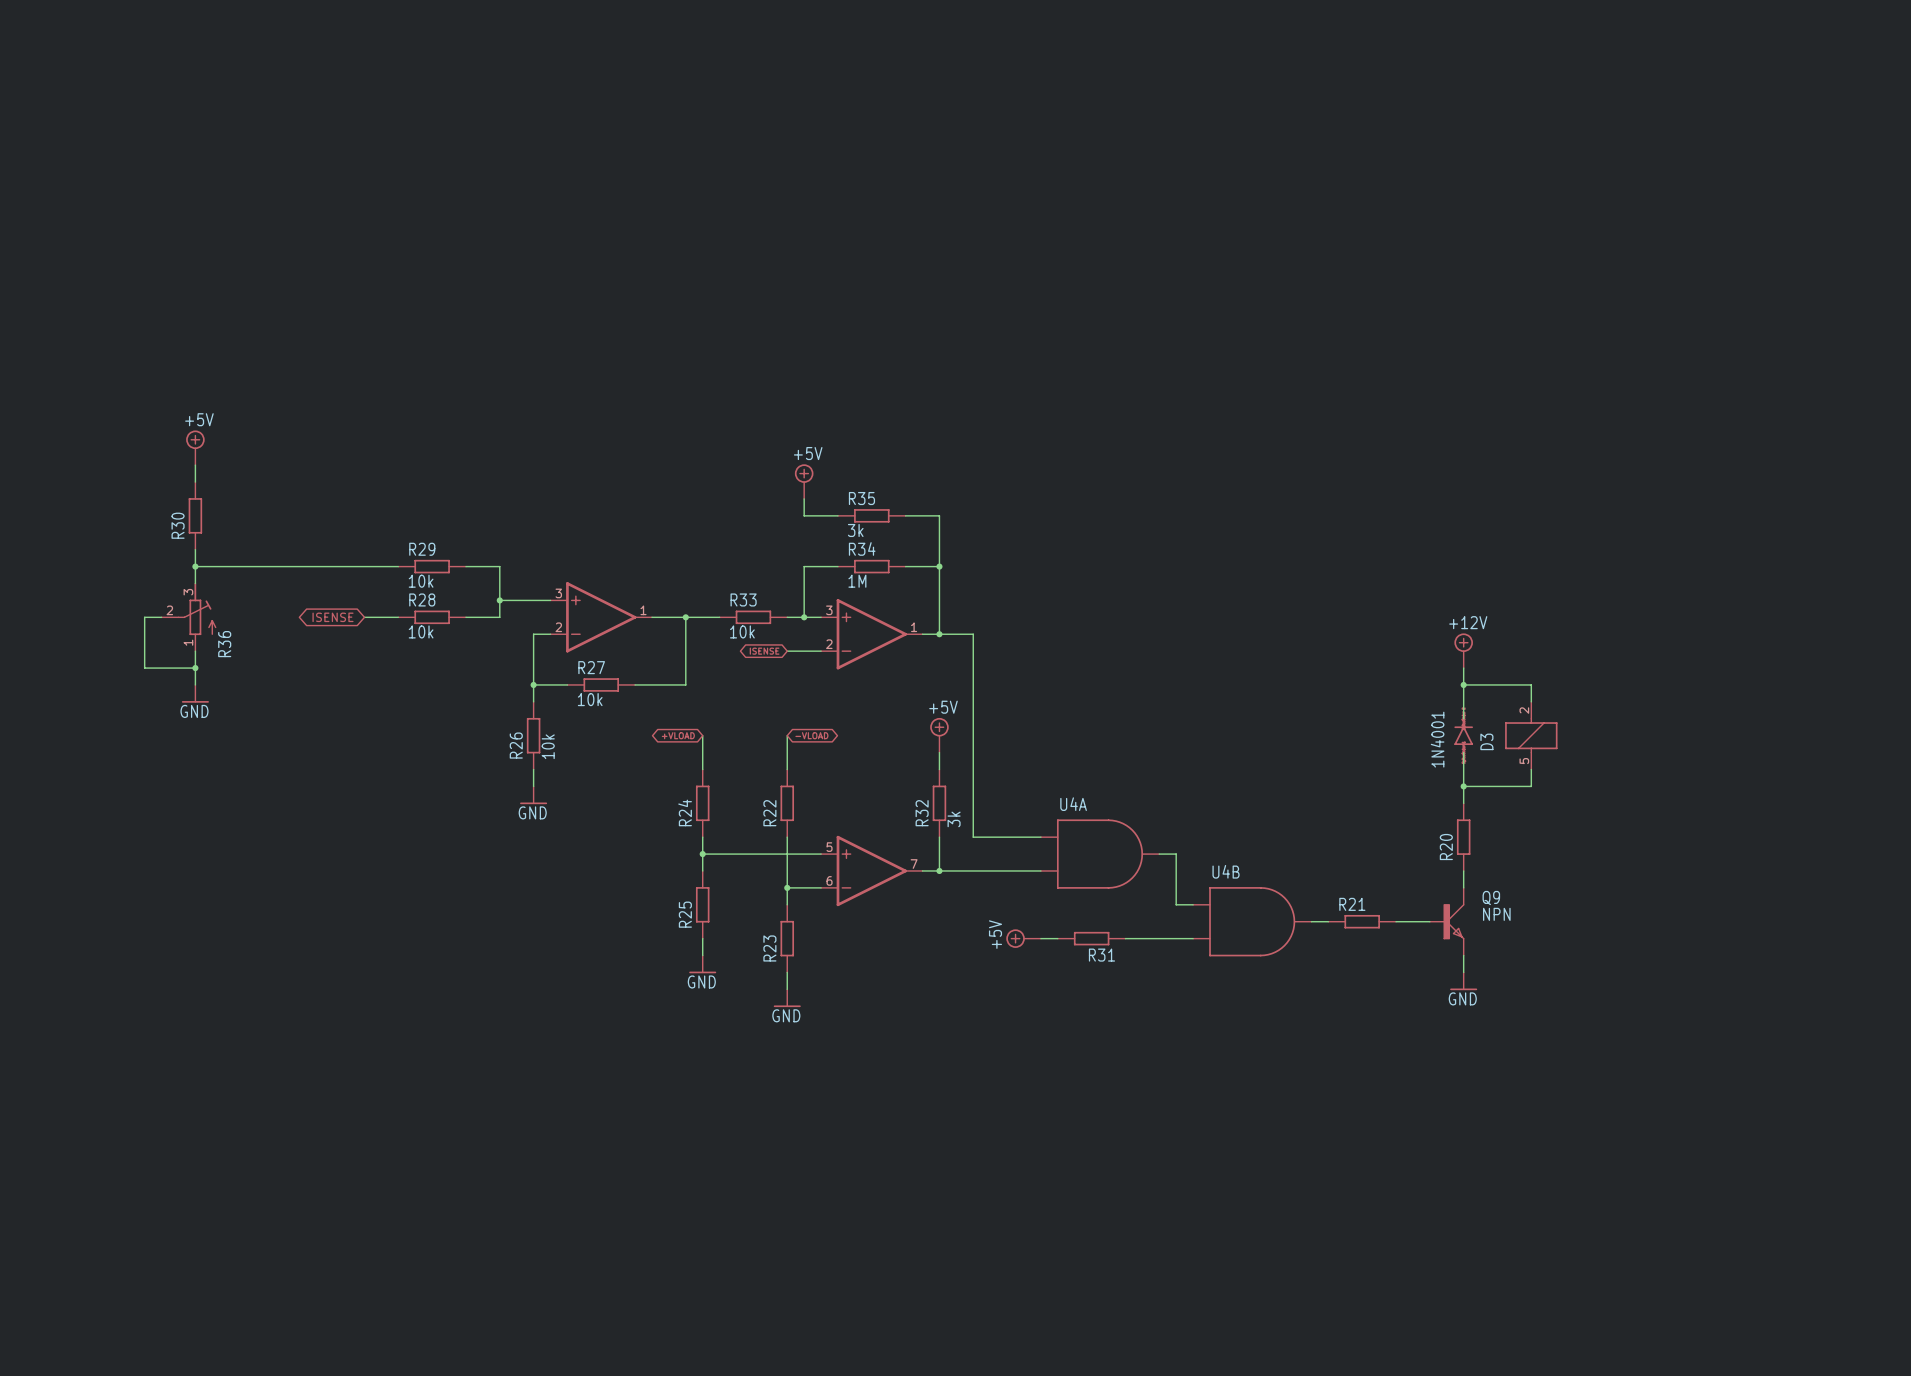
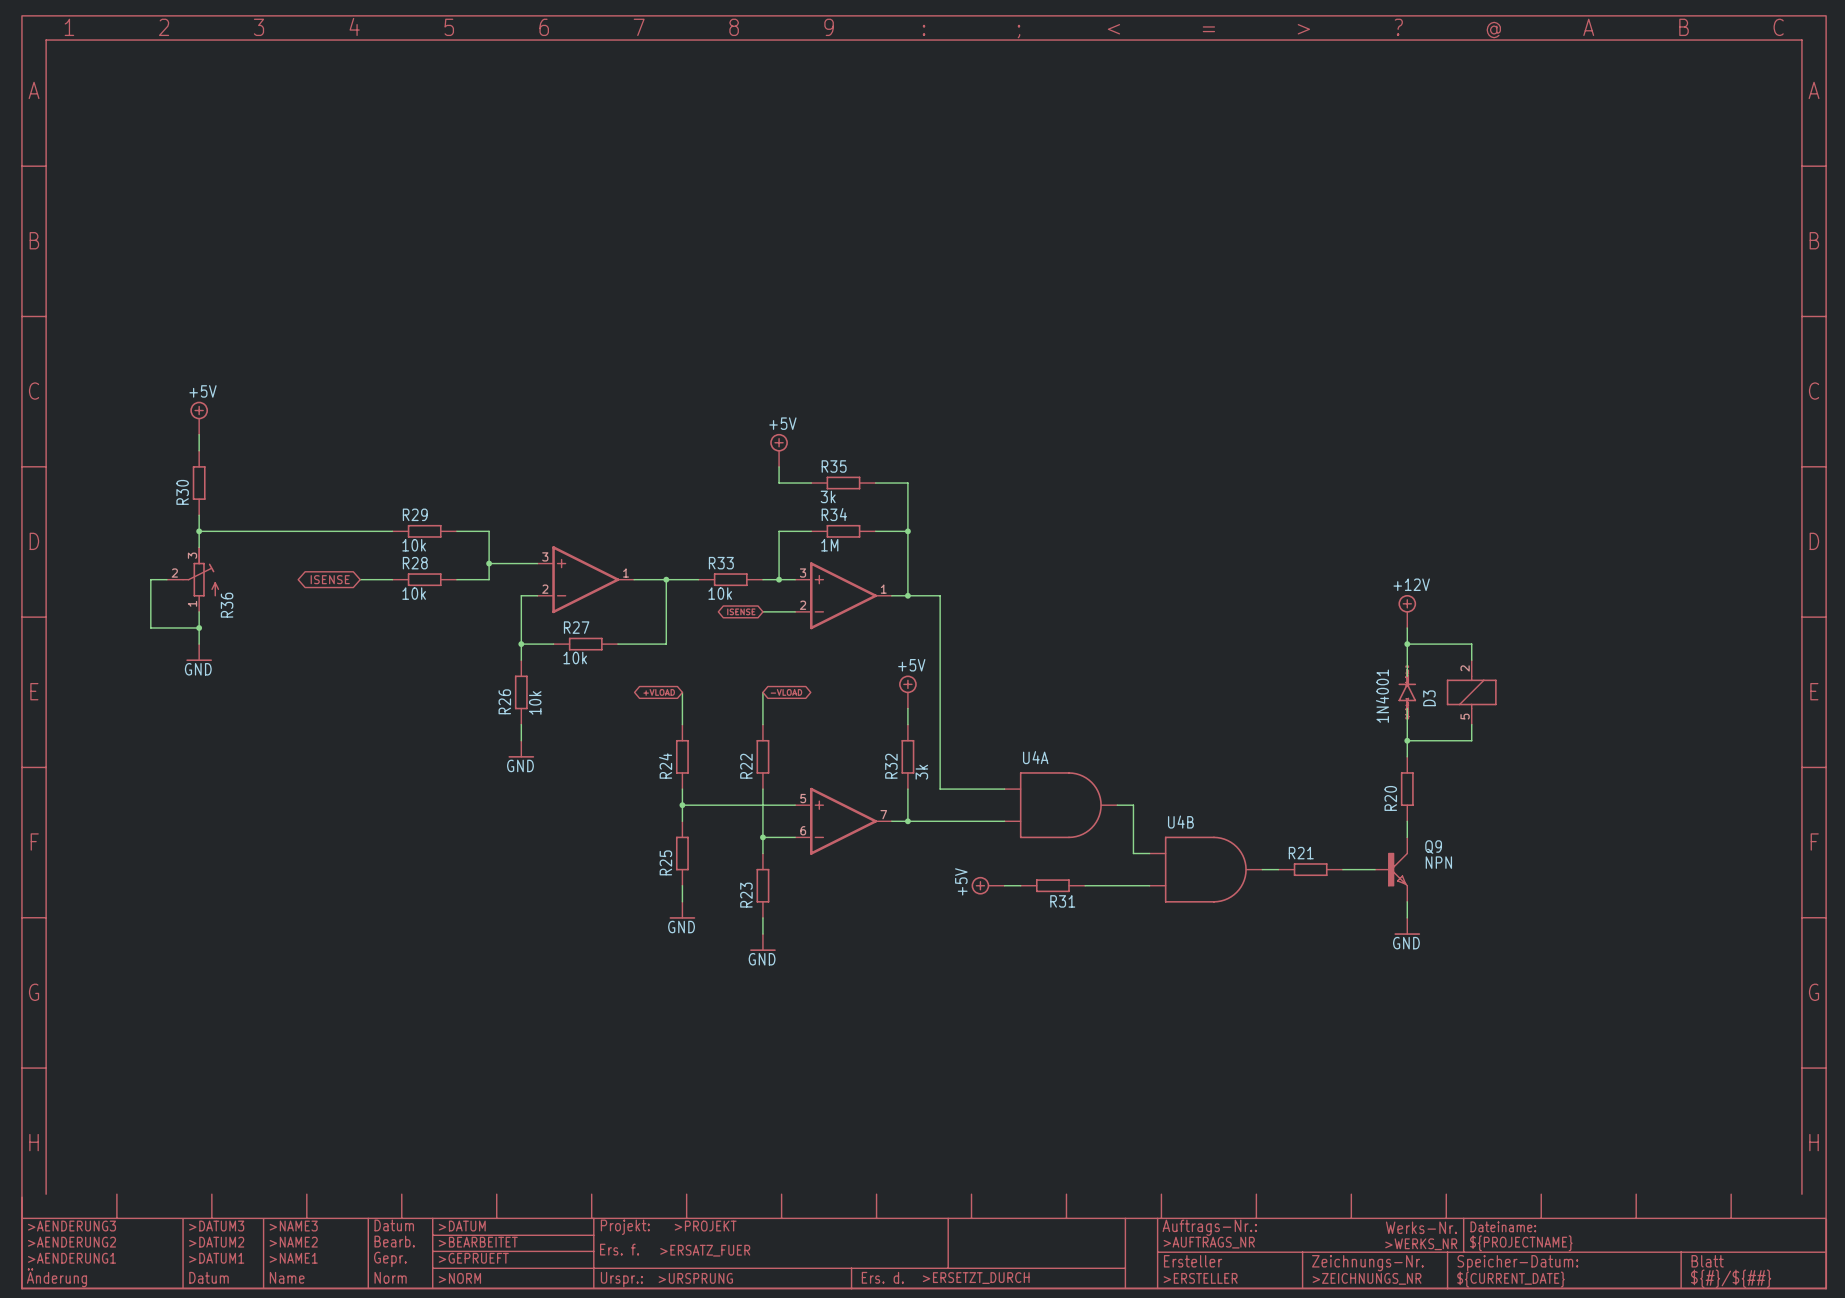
power symbol: none -> (924, 652)

